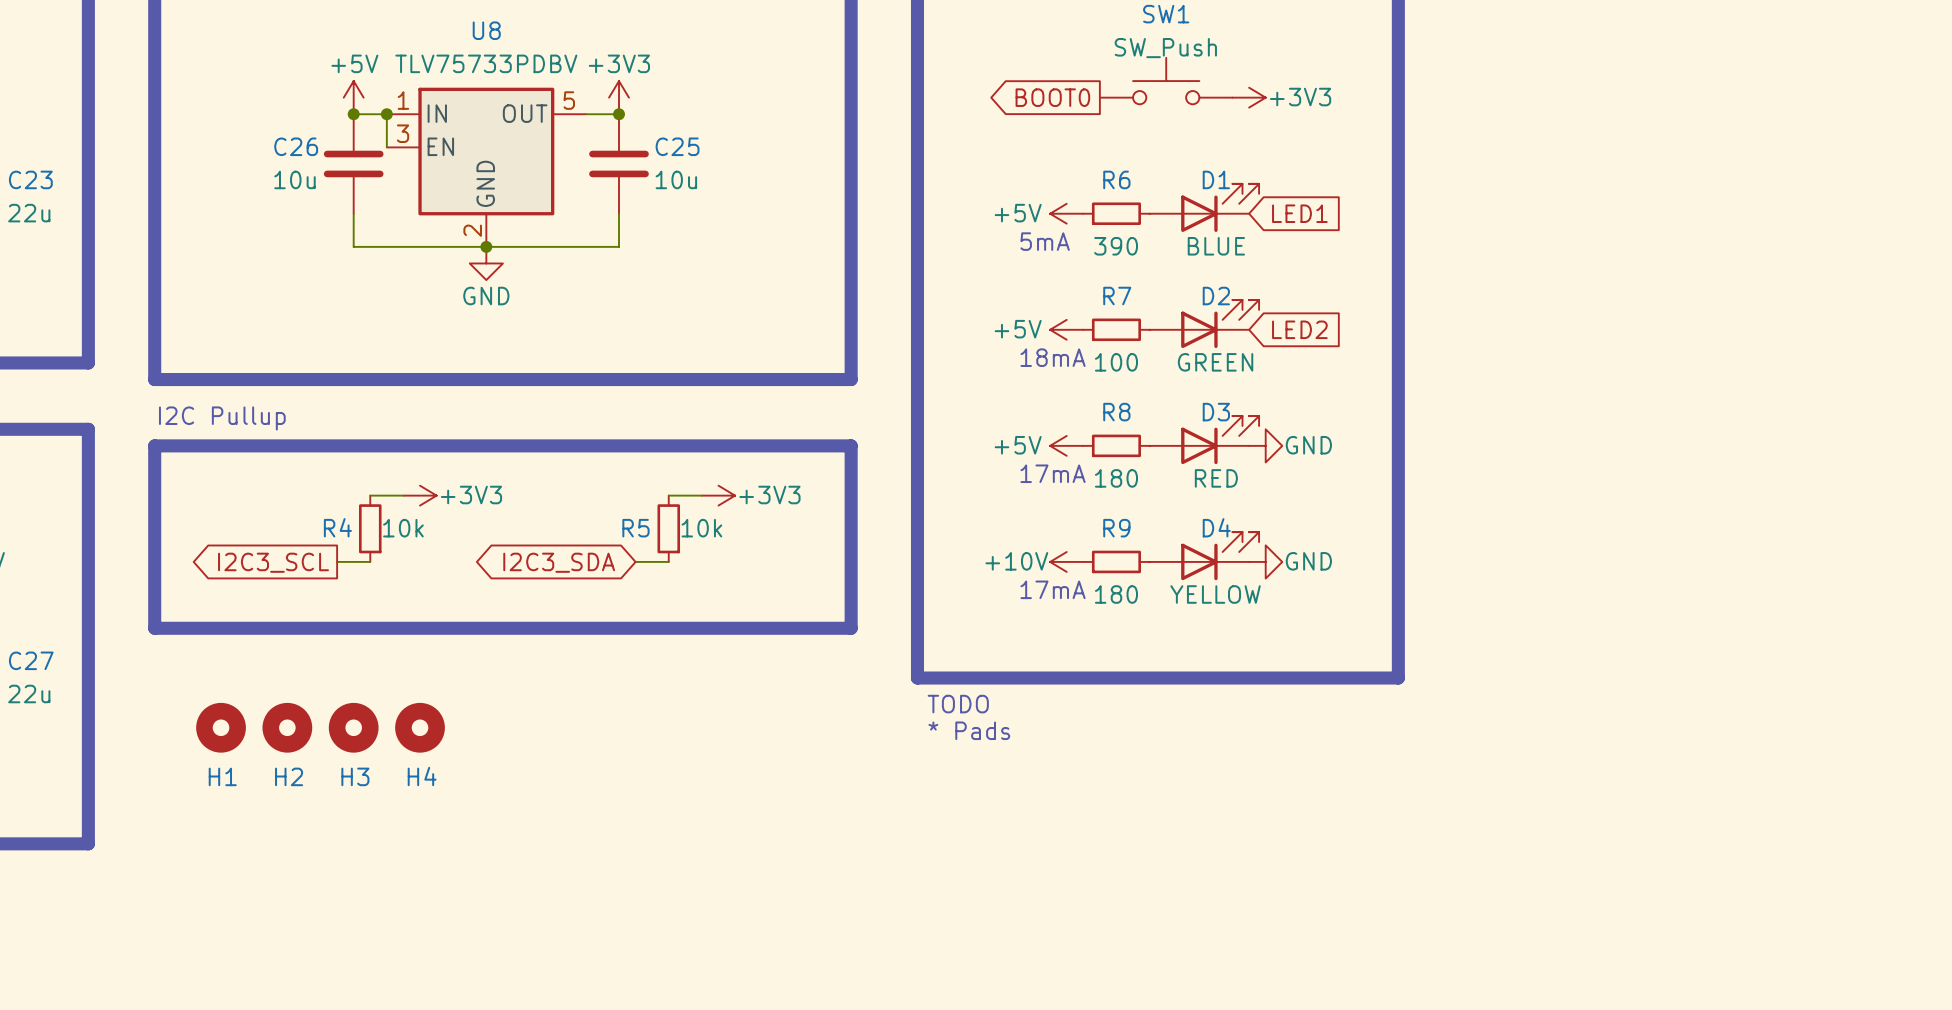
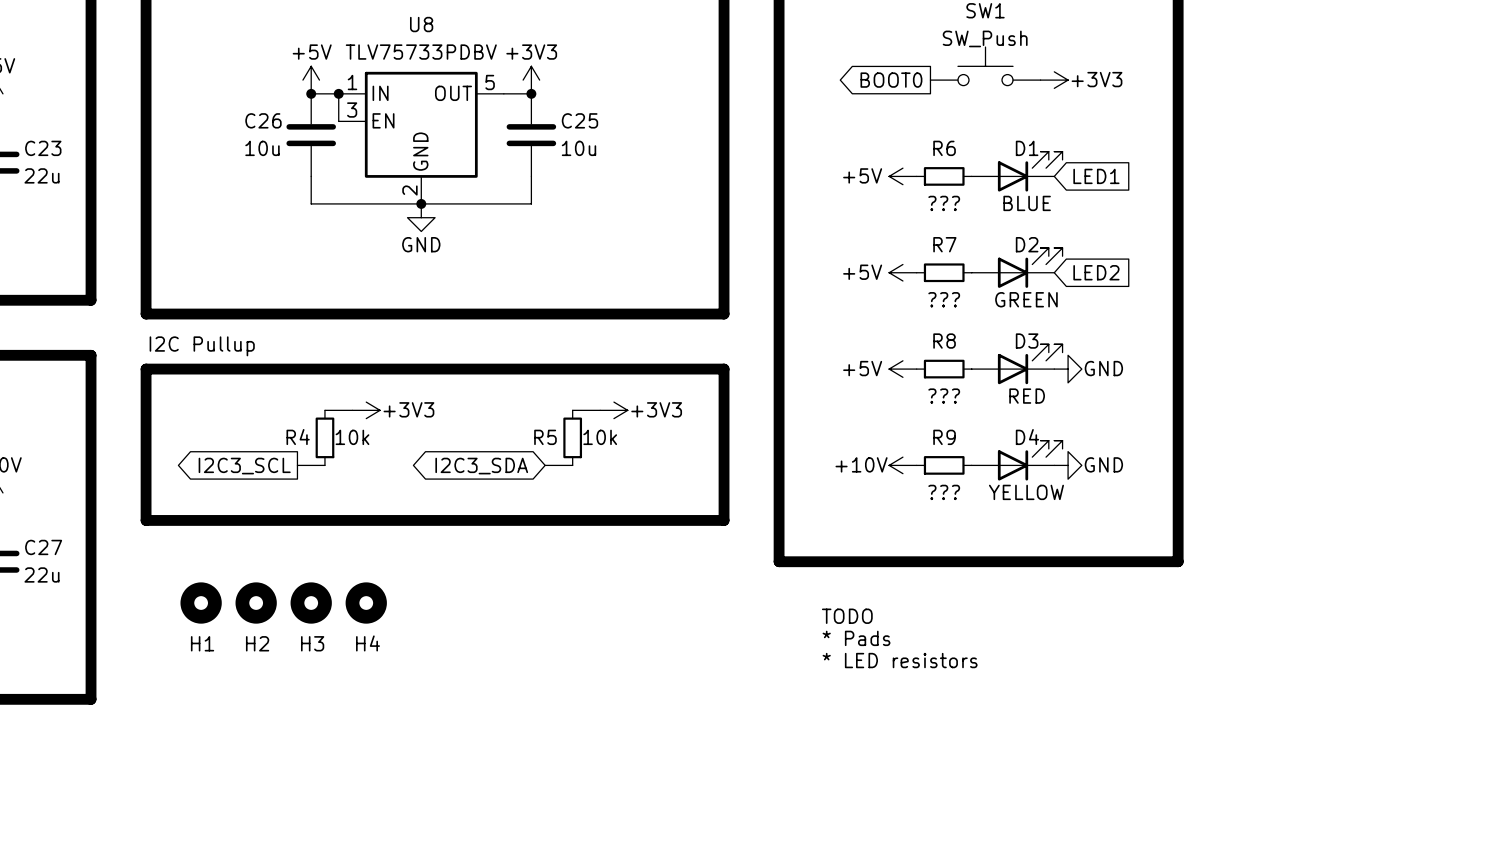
text: 5mA (1045, 241) -> none
R6 value: 390 (1116, 246) -> ??? (944, 203)
text: 18mA (1053, 357) -> none
R7 value: 100 (1116, 362) -> ??? (944, 299)
text: 17mA (1053, 473) -> none
R8 value: 180 (1116, 478) -> ??? (944, 396)
text: 17mA (1053, 589) -> none
R9 value: 180 (1116, 594) -> ??? (944, 492)
text position: TODO (958, 704) -> TODO (847, 616)
text position: * Pads (969, 730) -> * Pads (856, 638)
text: none -> * LED resistors (900, 660)

